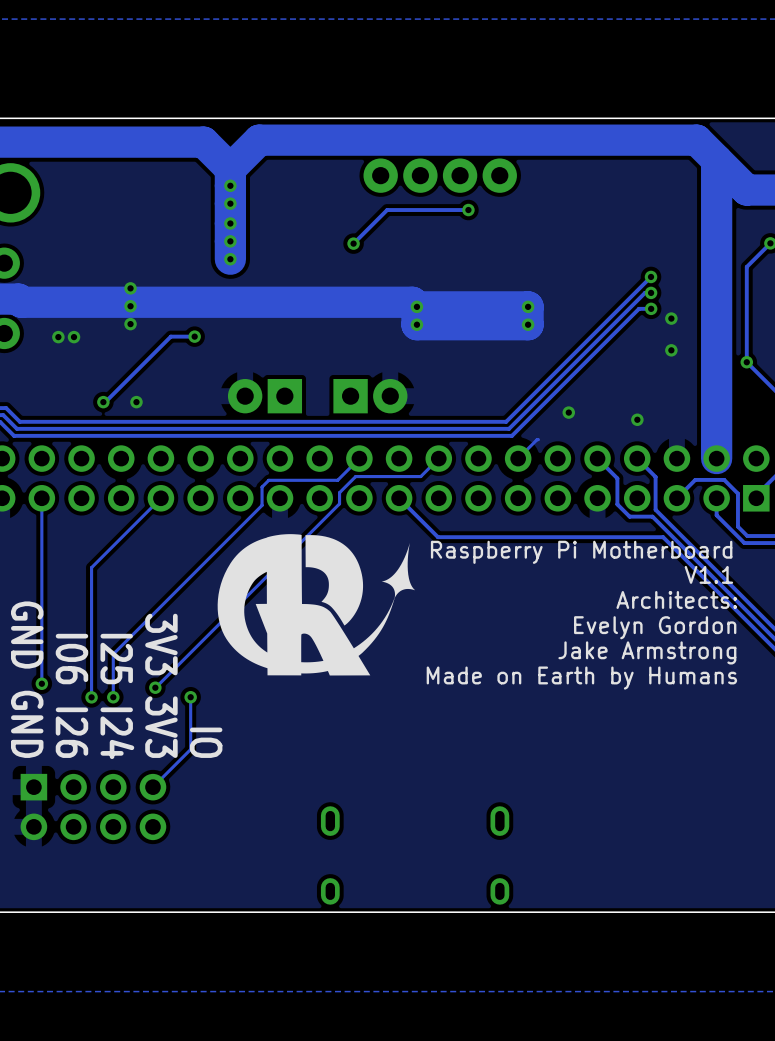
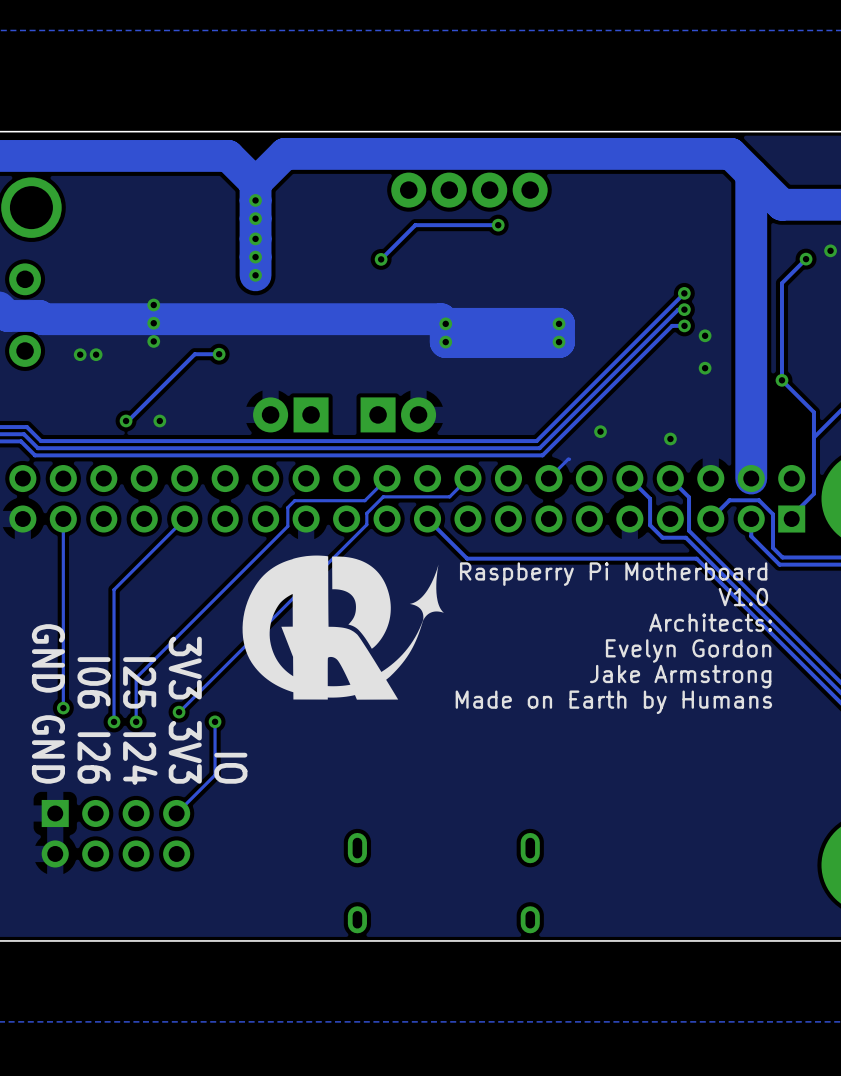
text: V1.1 (708, 574) -> V1.0 (743, 597)

